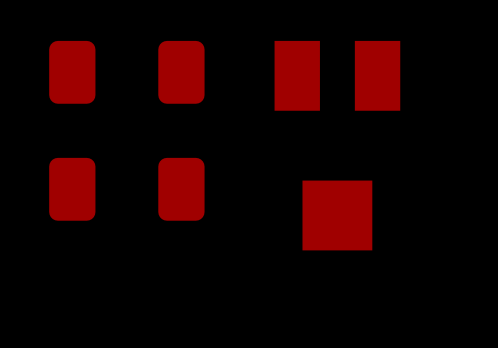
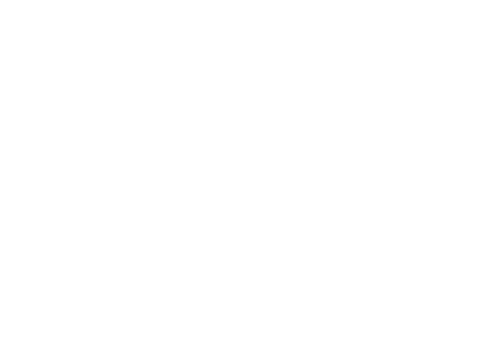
part: (126, 72) -> none
part: (337, 145) -> none
part: (126, 189) -> none

